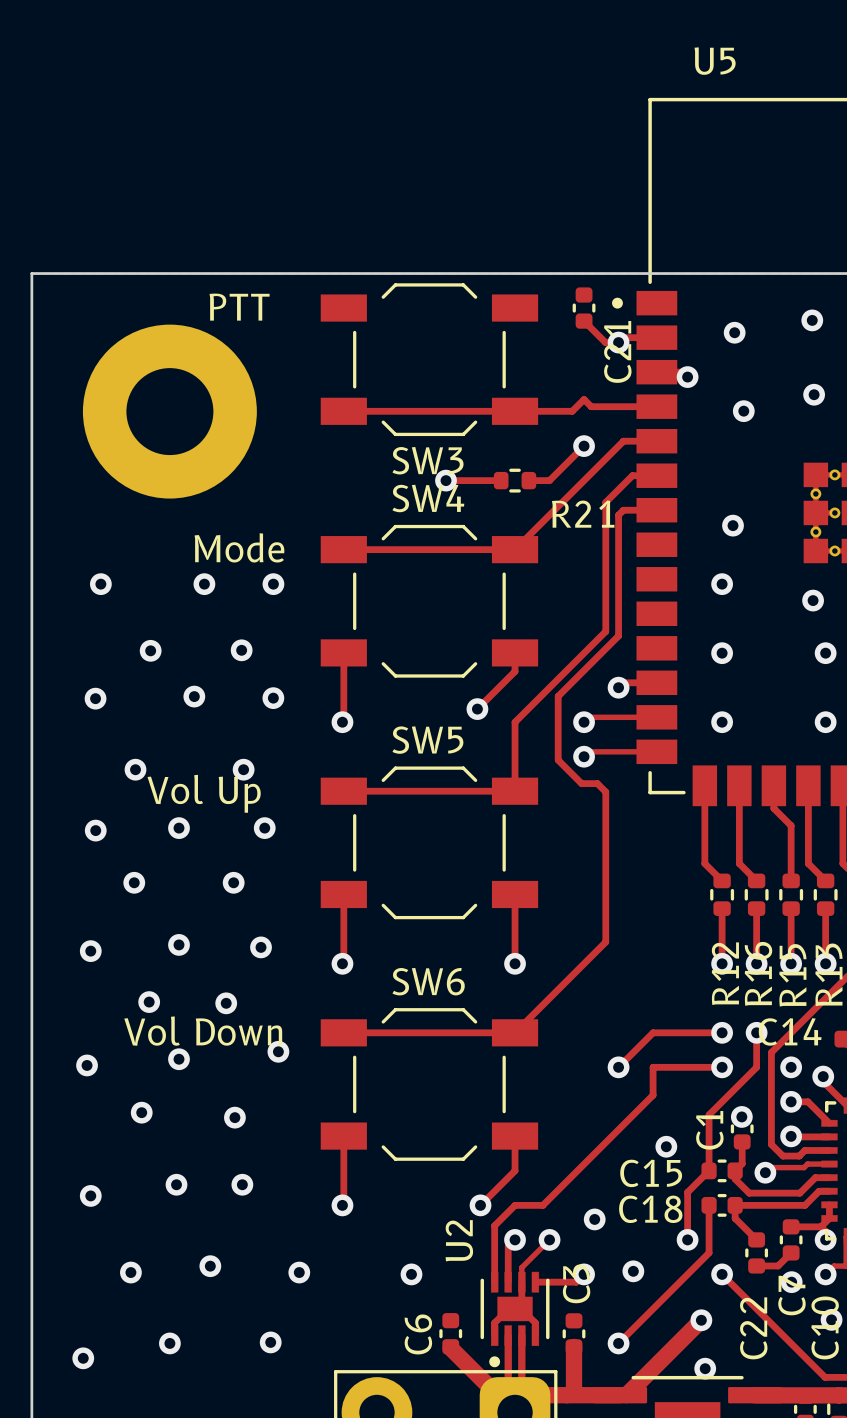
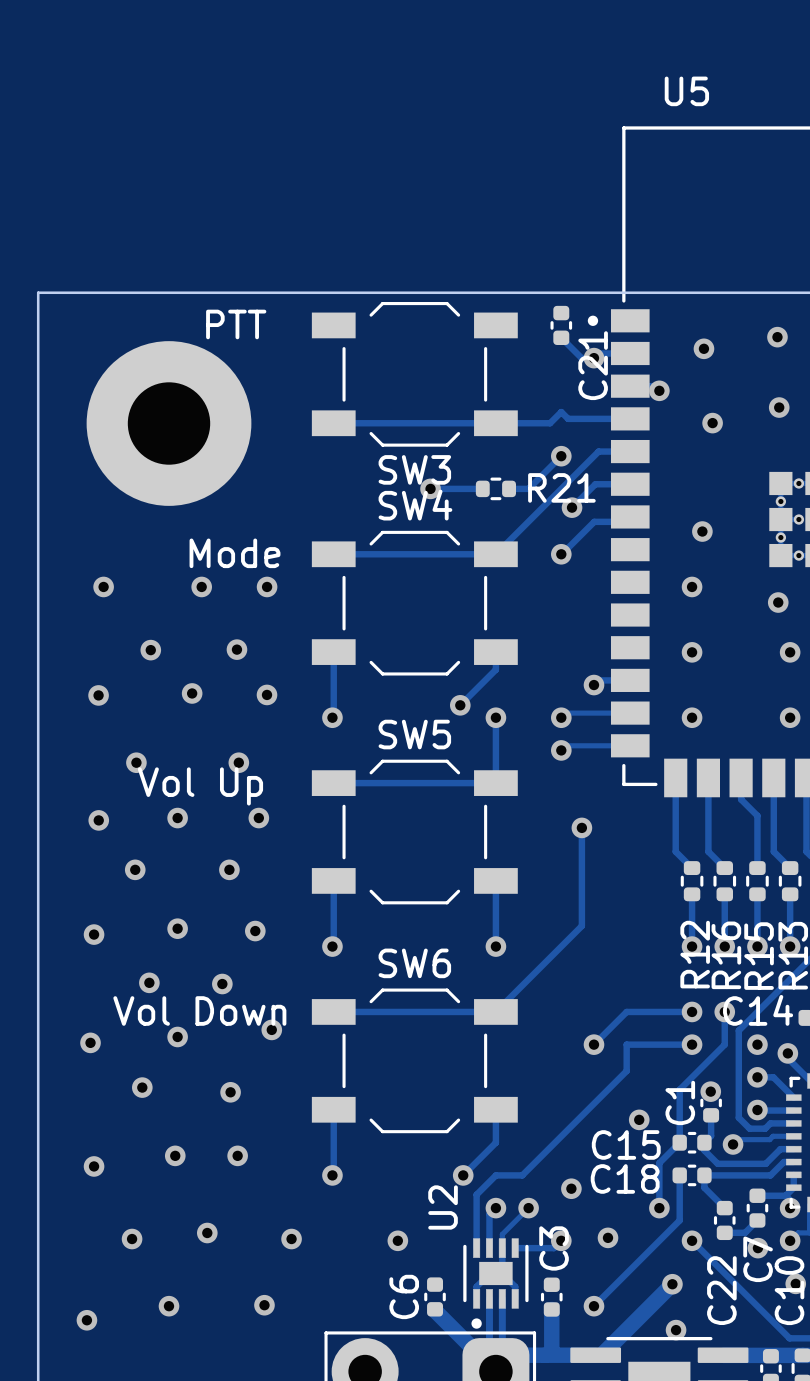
track: (632, 475) (605, 502) (605, 631) (515, 722) -> (607, 484) (595, 484) (572, 507)
via: none -> (572, 507)
track: (656, 510) (623, 510) (618, 515) (618, 635) (558, 696) (558, 760) (581, 783) (597, 783) (605, 791) (605, 838) -> (630, 516) (625, 521) (594, 521) (561, 554)
R21 name position: R21 (583, 514) -> R21 (561, 487)
via: none -> (561, 554)
via: none -> (495, 717)
via: none -> (581, 827)

